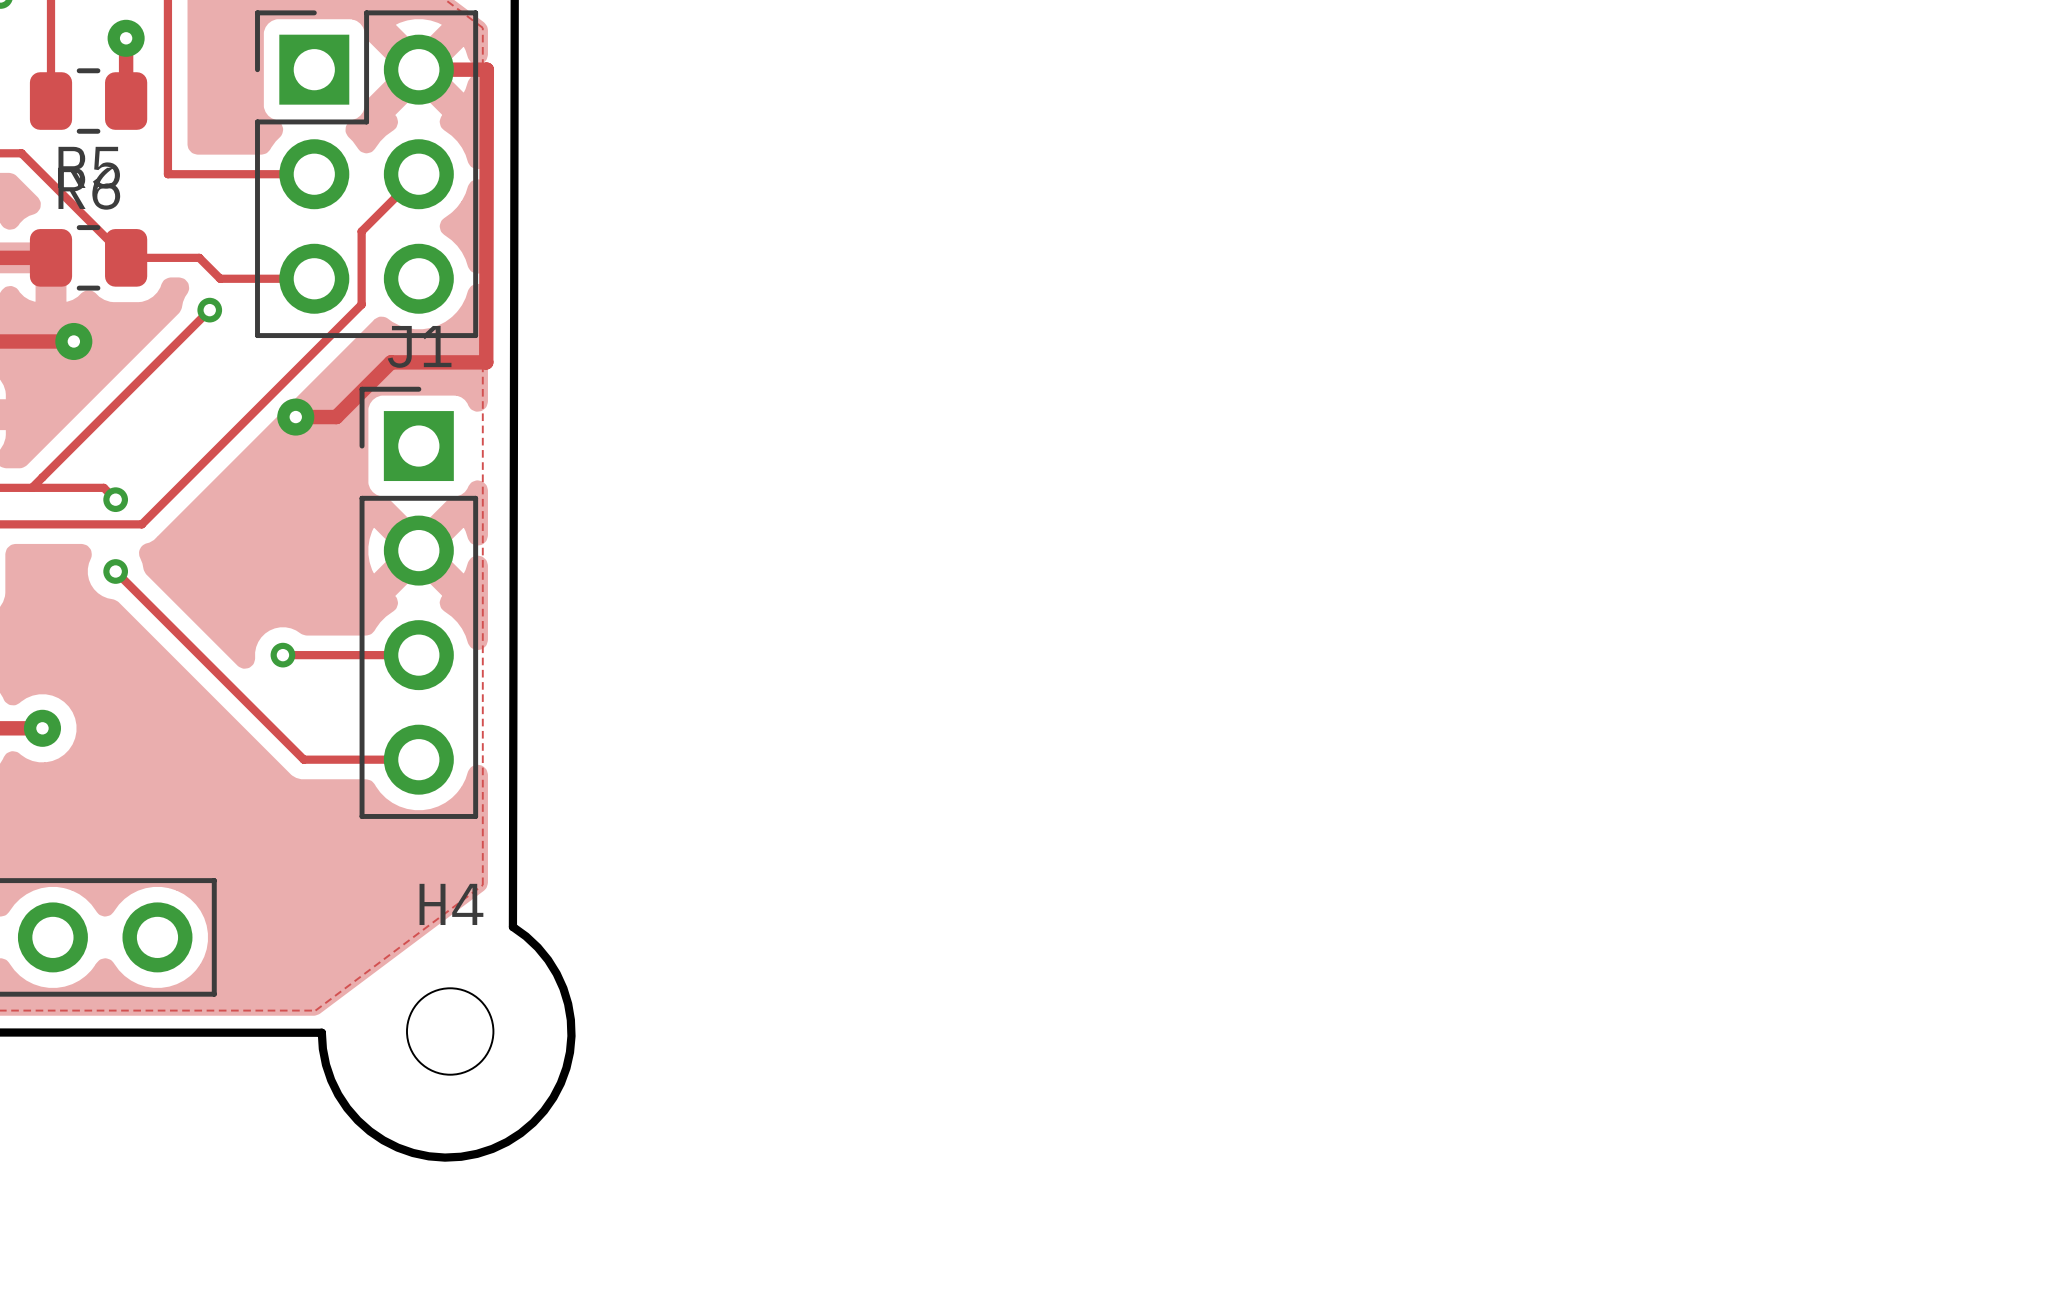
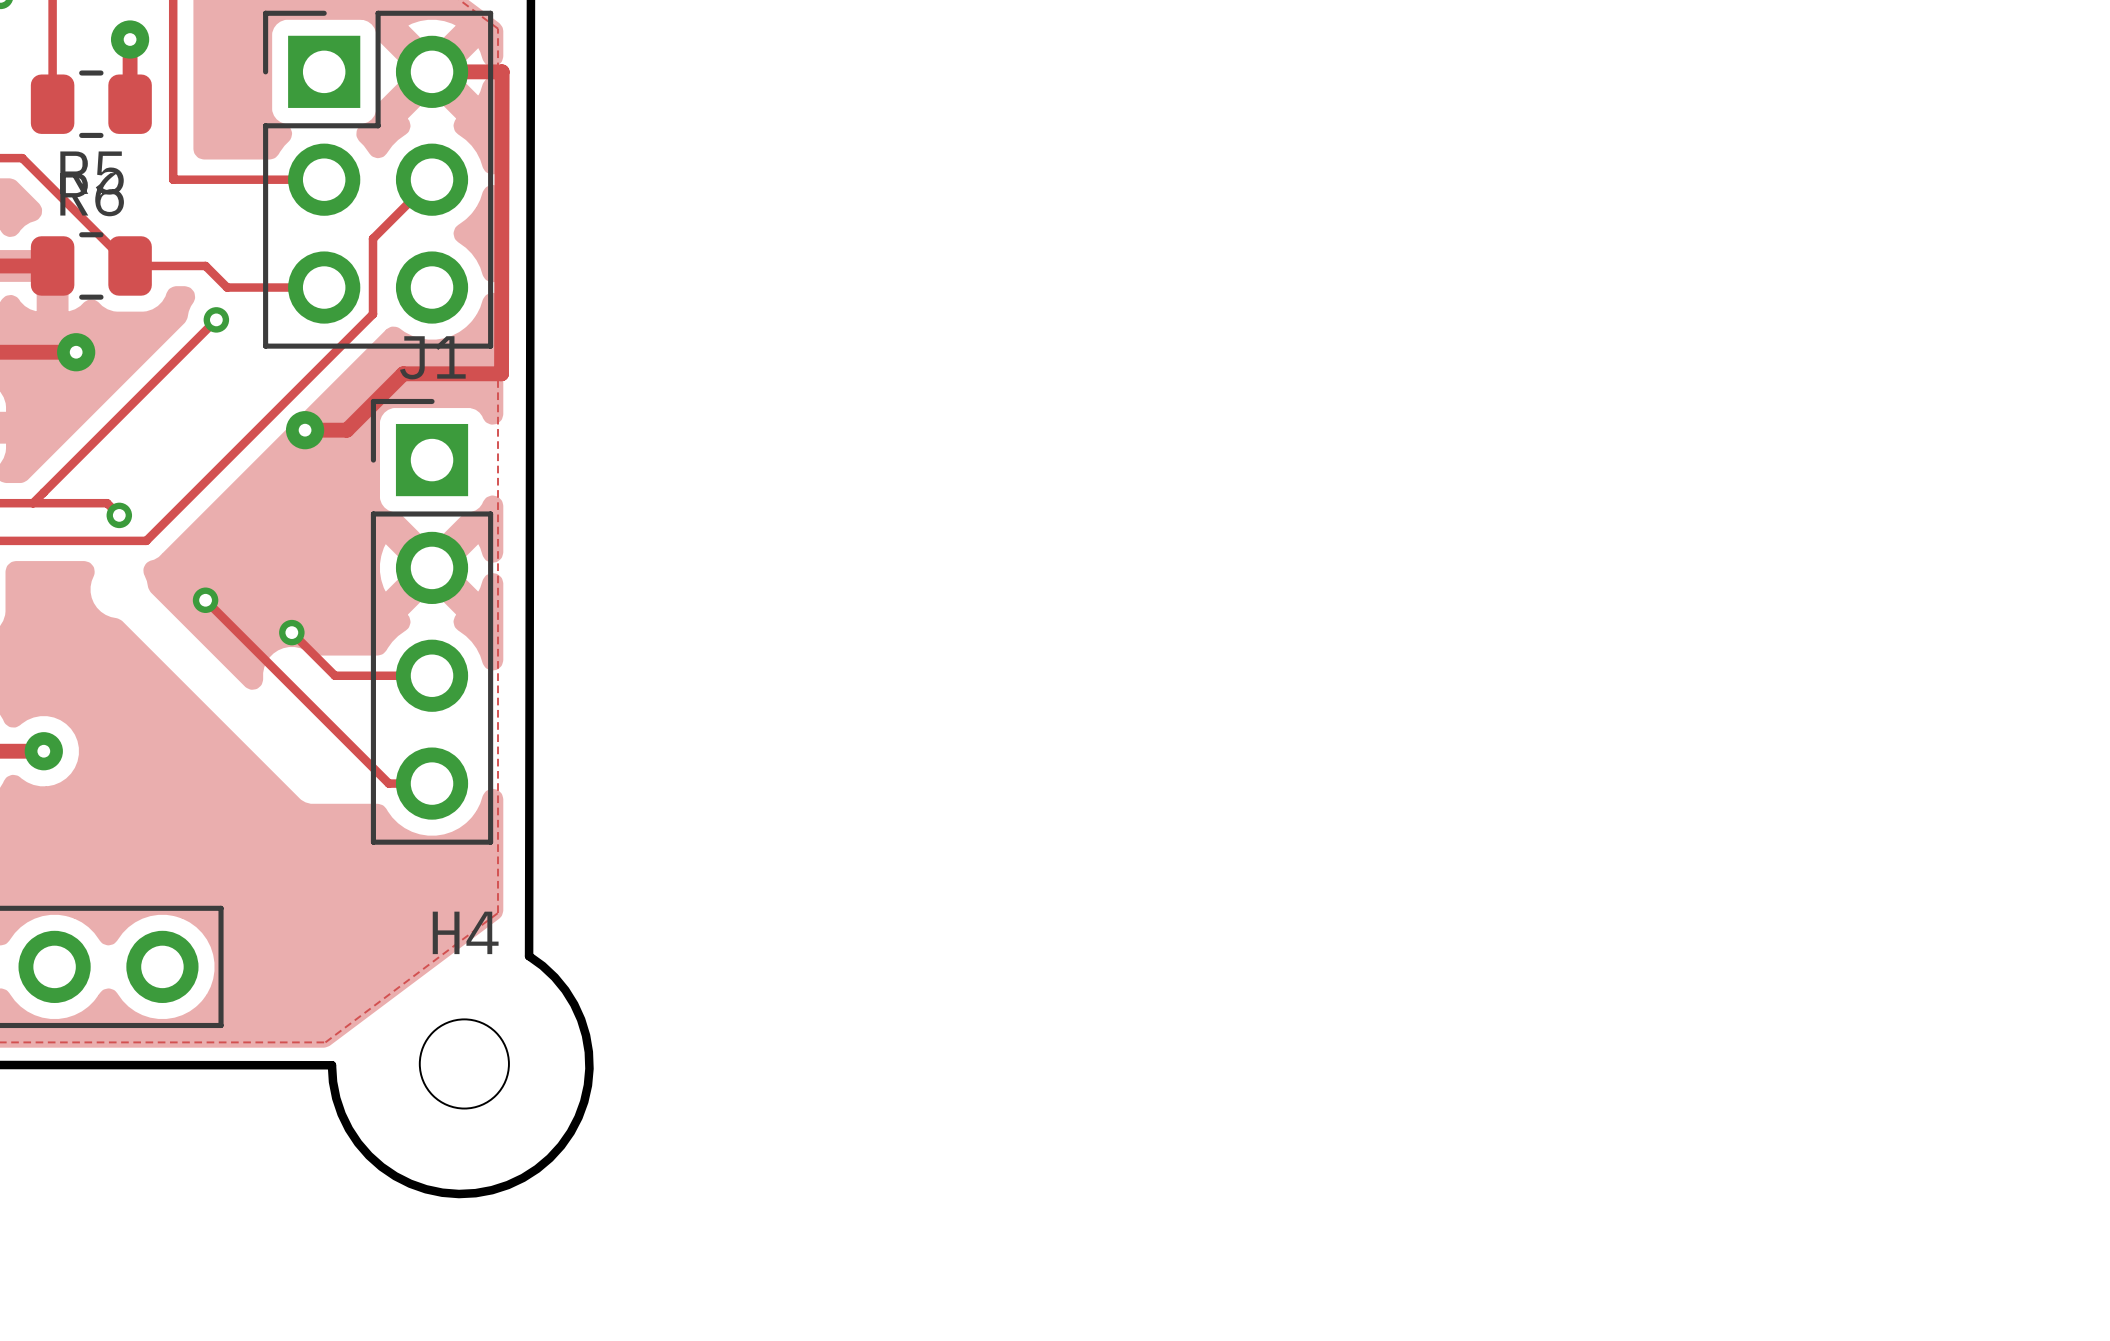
track: (115, 571) (303, 759) (377, 759) -> (205, 600) (388, 783)
via: (115, 571) -> none
via: none -> (205, 600)
track: (282, 655) (324, 655) -> (291, 632) (334, 675)
via position: (282, 655) -> (291, 632)

